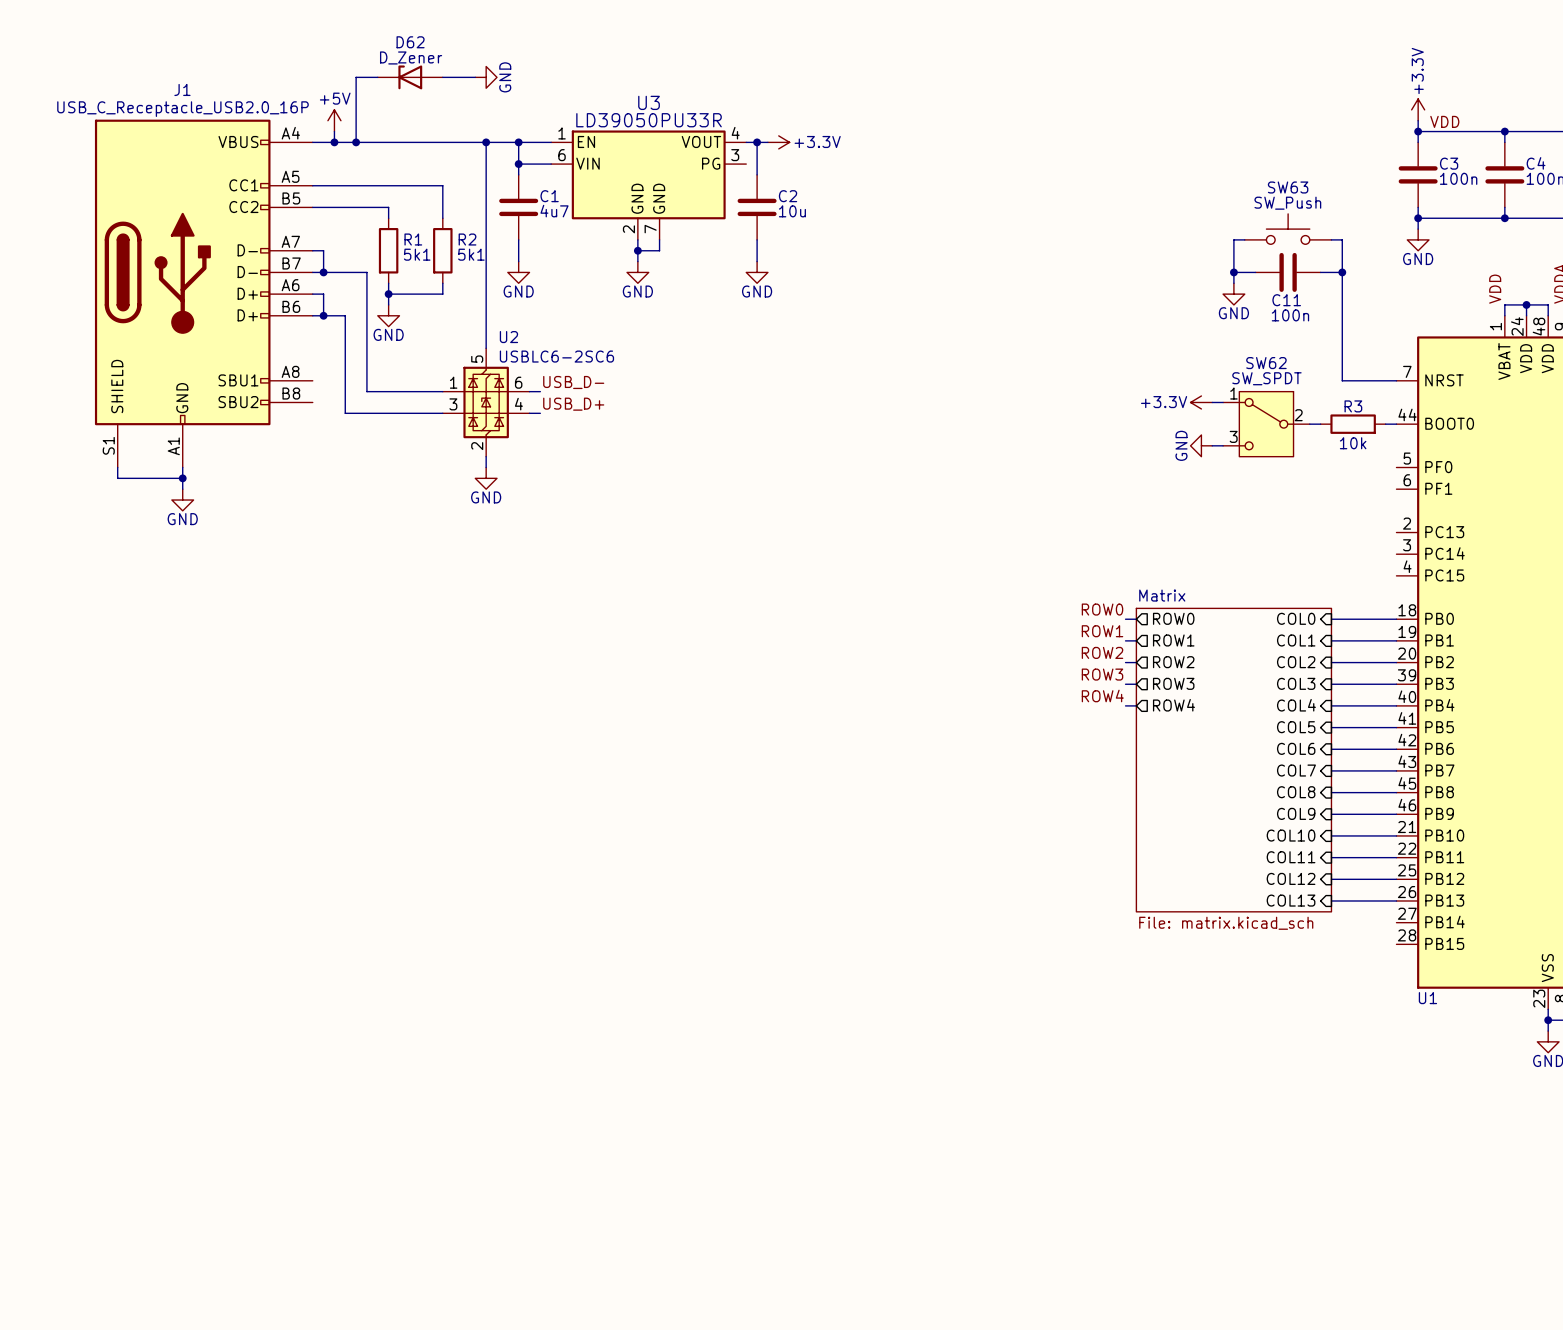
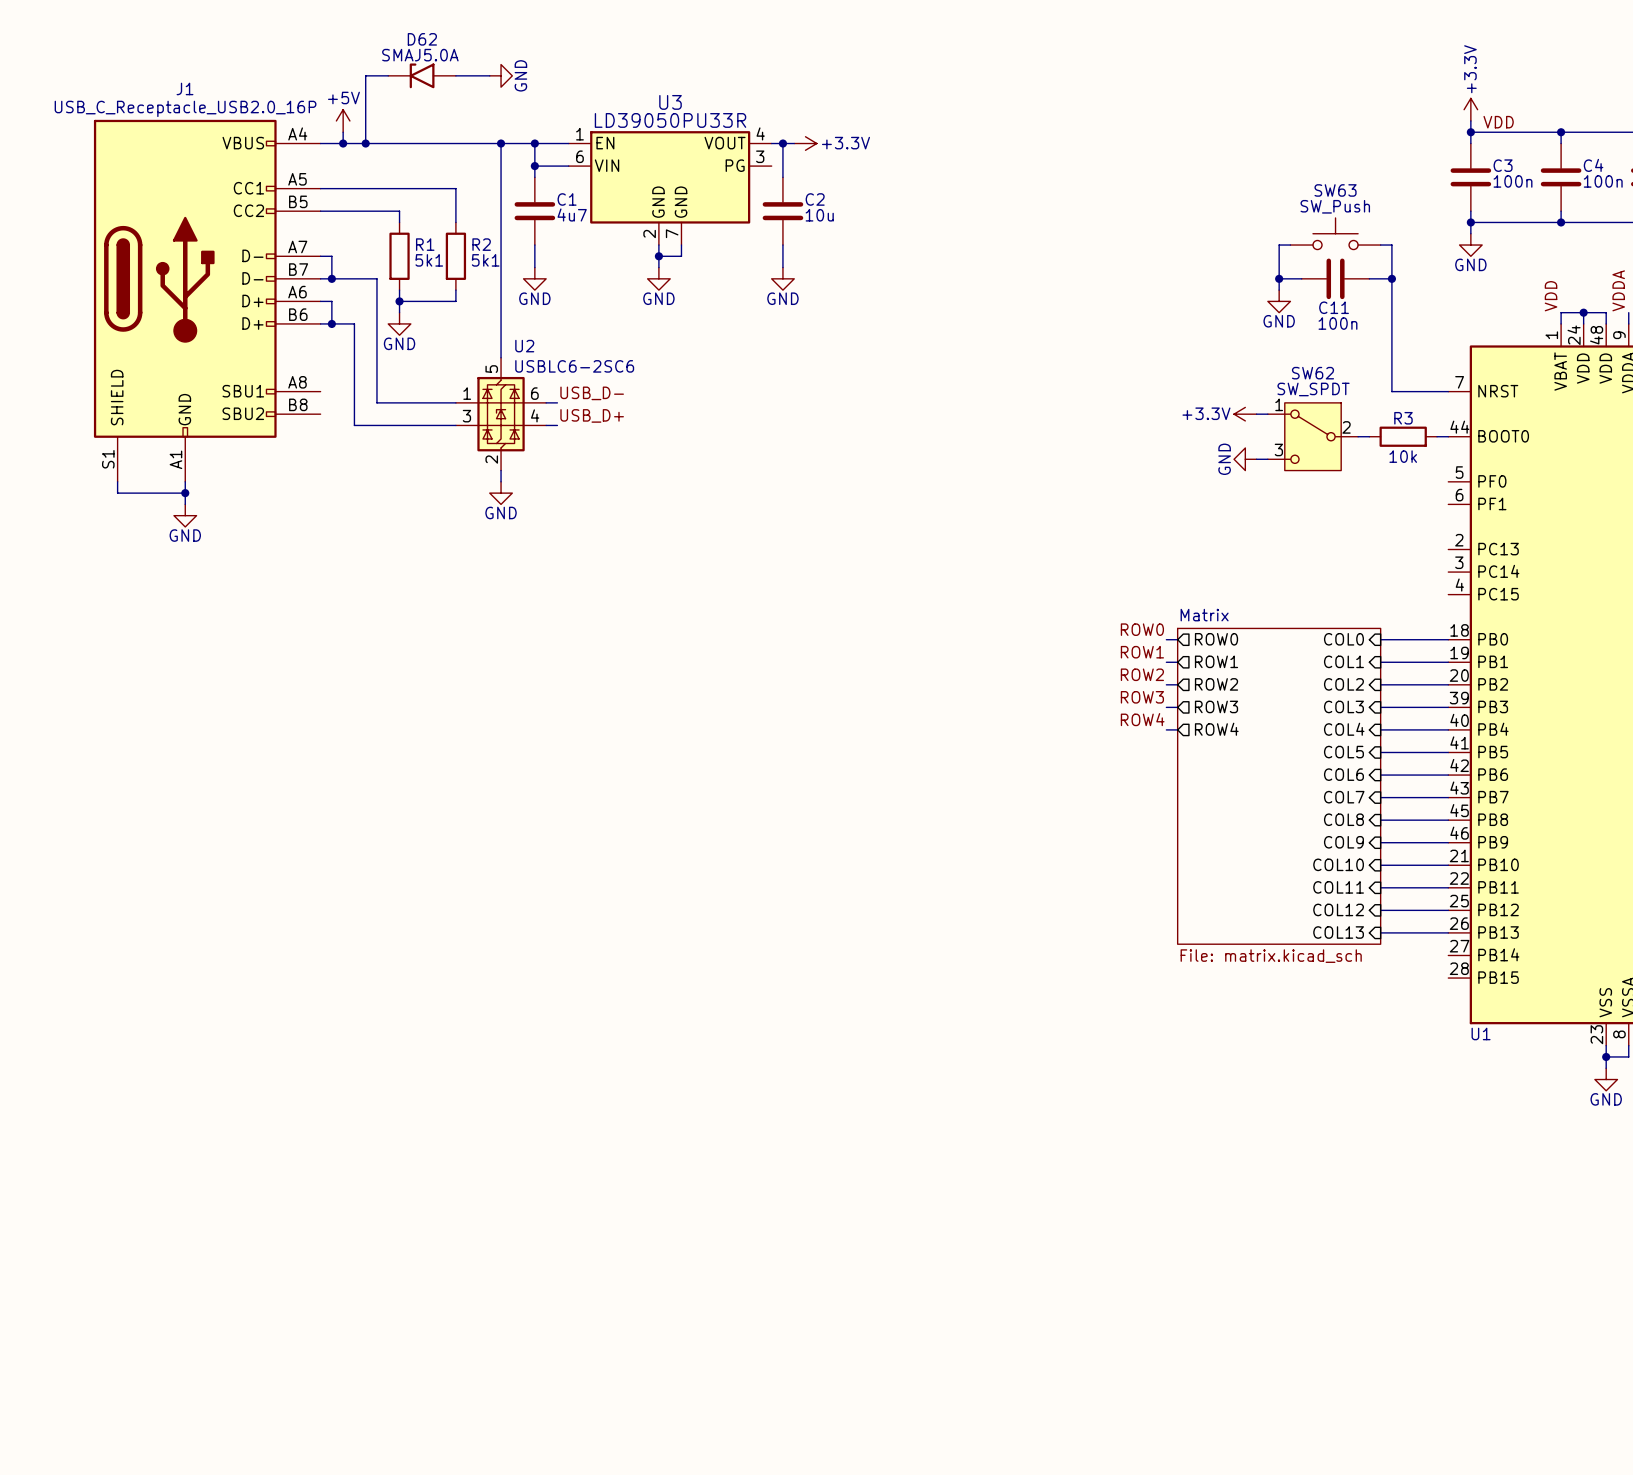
D62 value: D_Zener (411, 57) -> SMAJ5.0A (420, 55)
D62 symbol: [377, 65, 443, 90] -> [388, 63, 456, 89]

